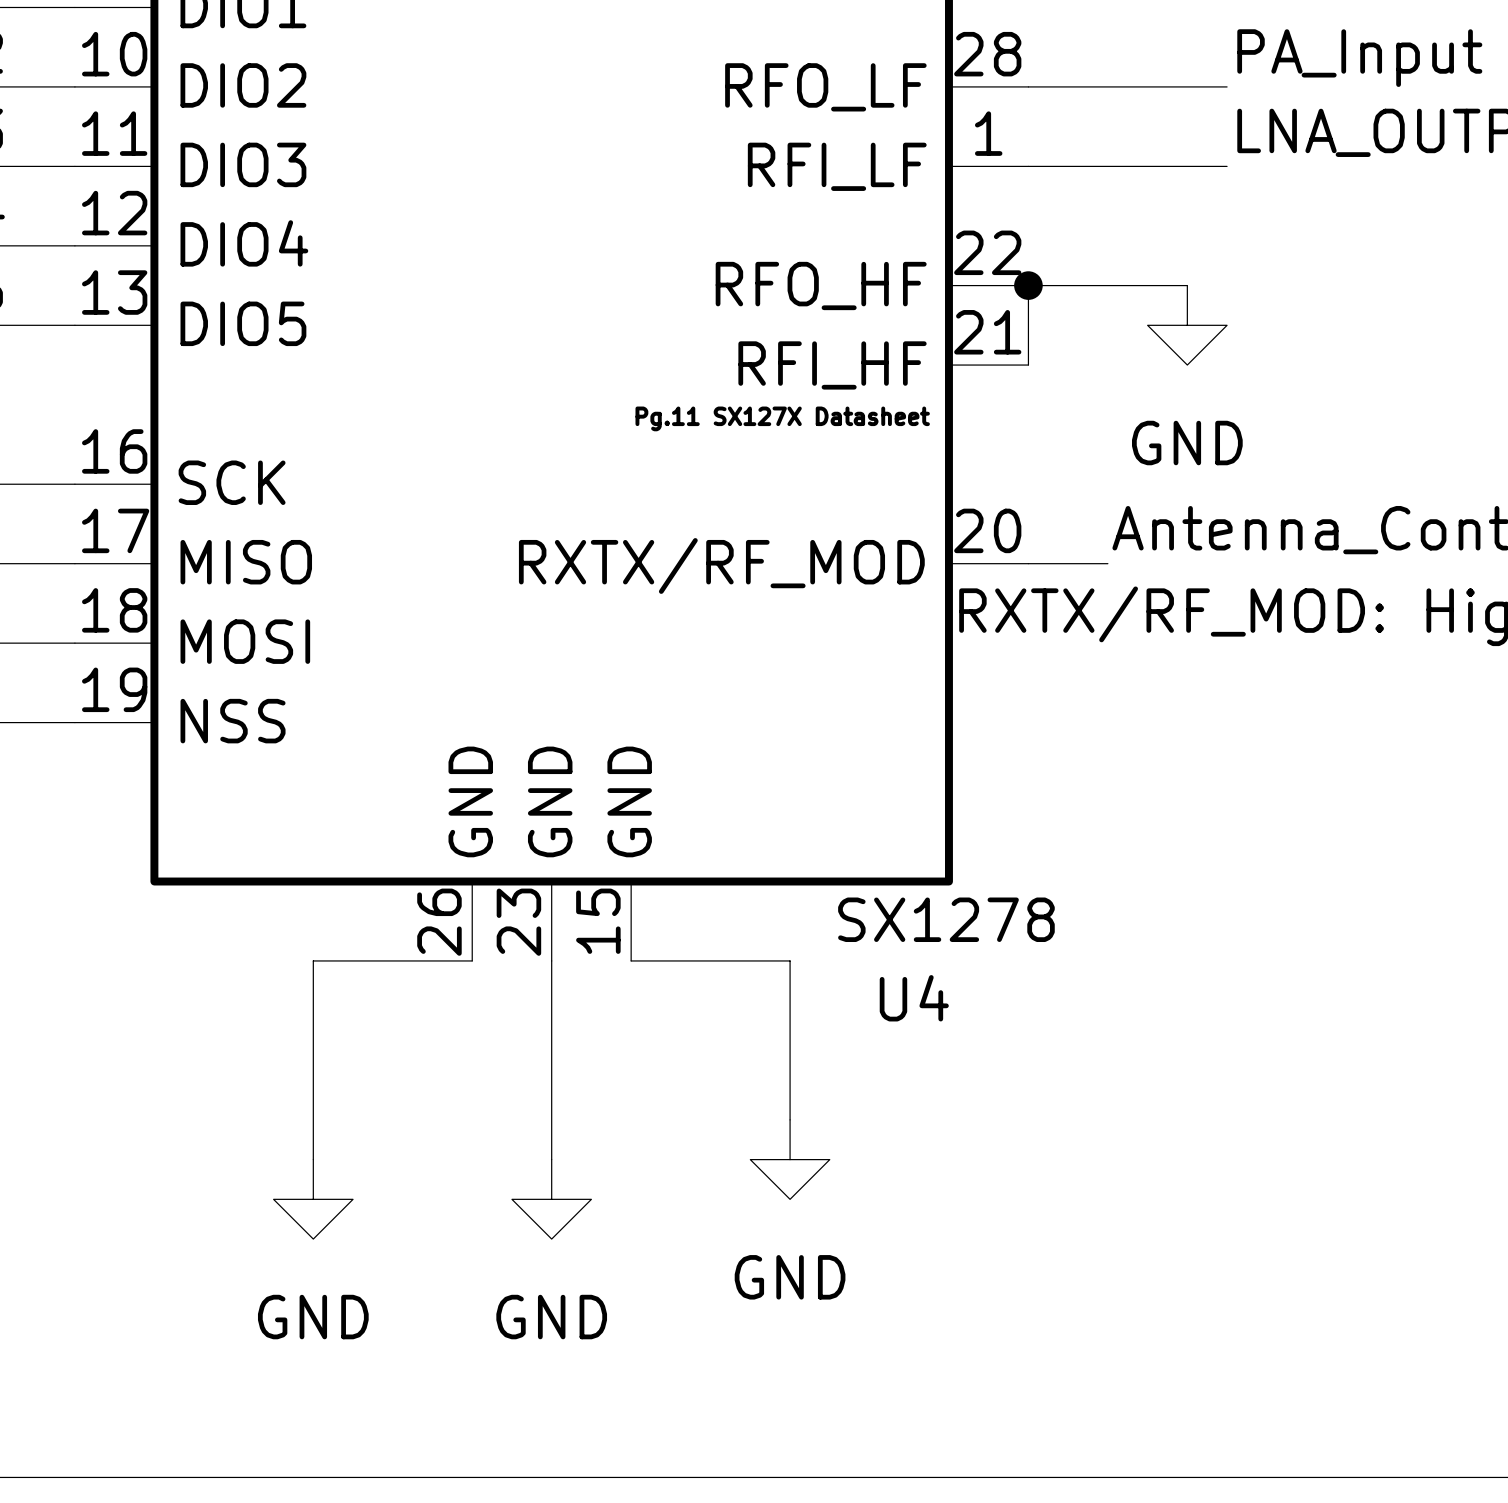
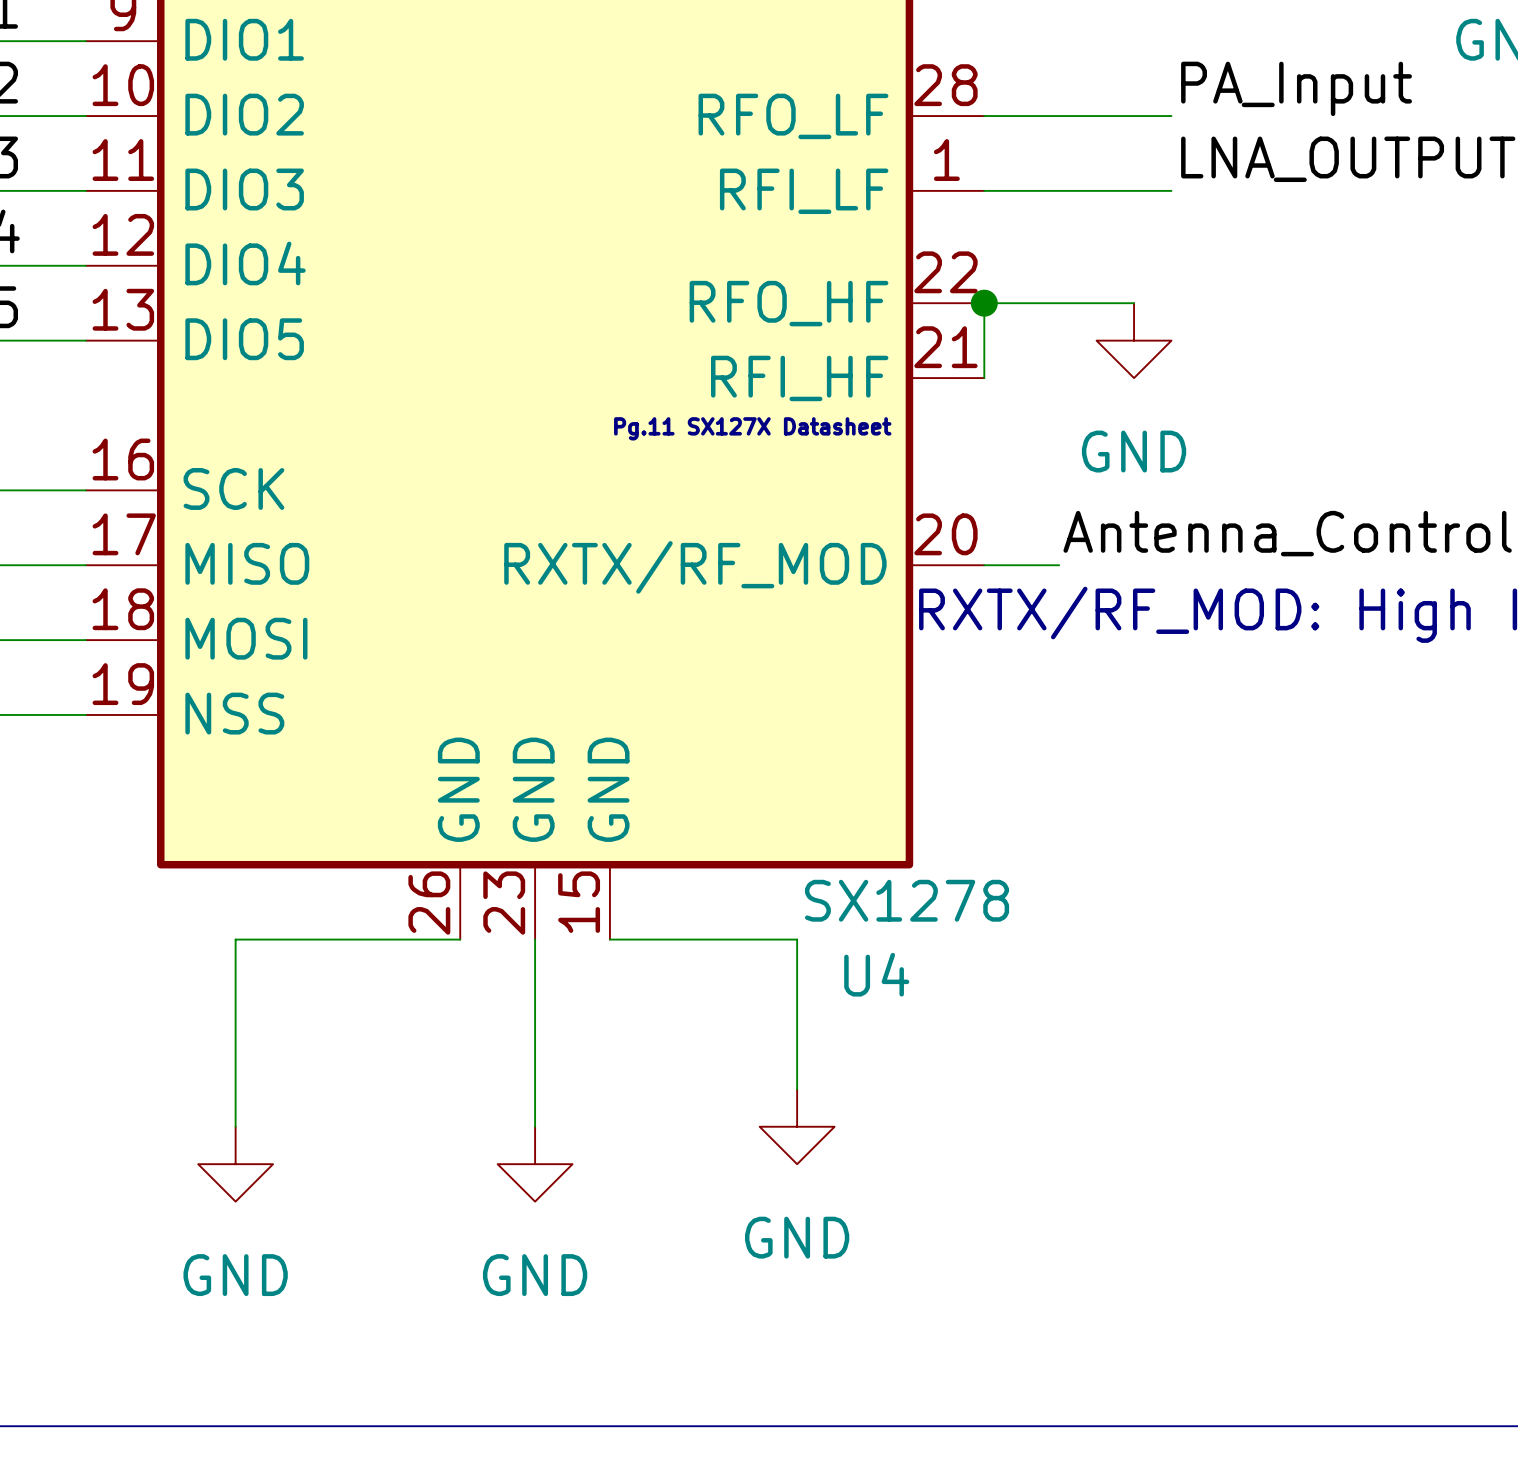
wire: (313, 960) (313, 1159) -> (310, 939) (235, 939) (235, 1126)
wire: (790, 960) (790, 1119) -> (759, 939) (797, 939) (797, 1089)
power symbol position: GND (790, 1159) -> GND (797, 1126)
power symbol position: GND (313, 1199) -> GND (235, 1164)

